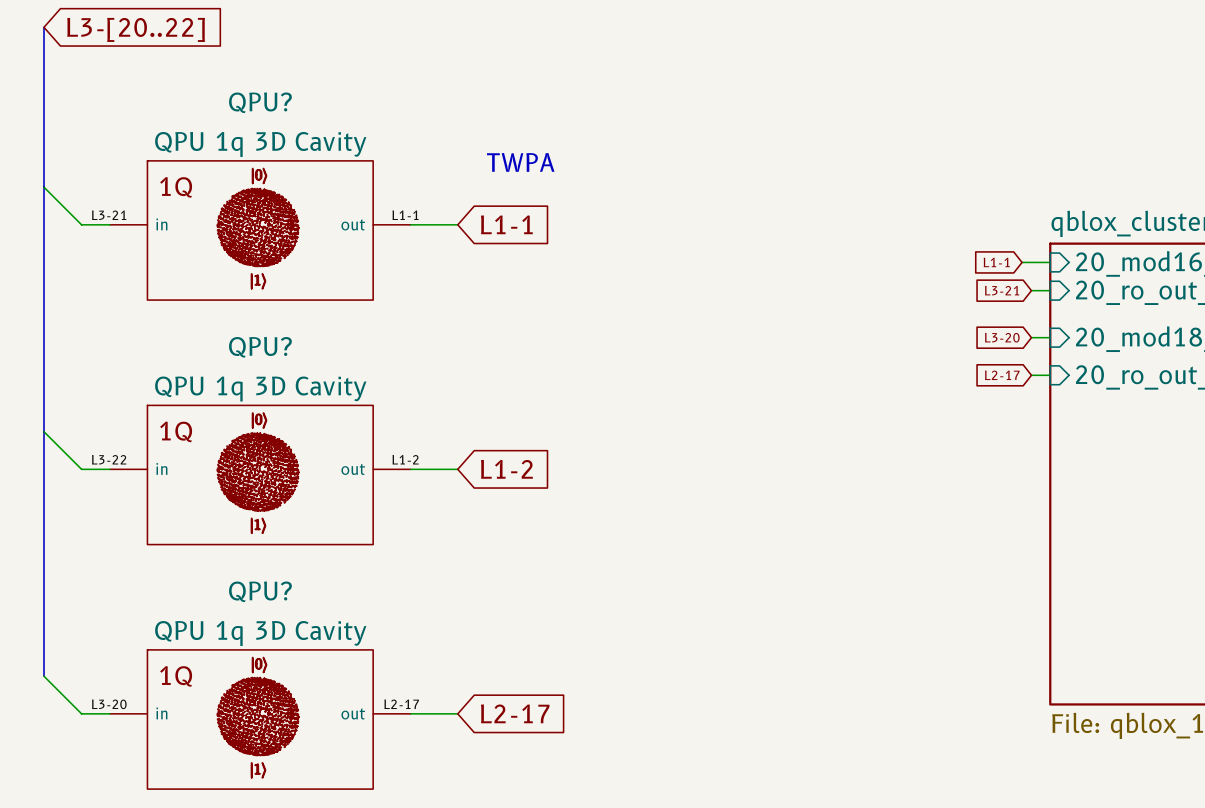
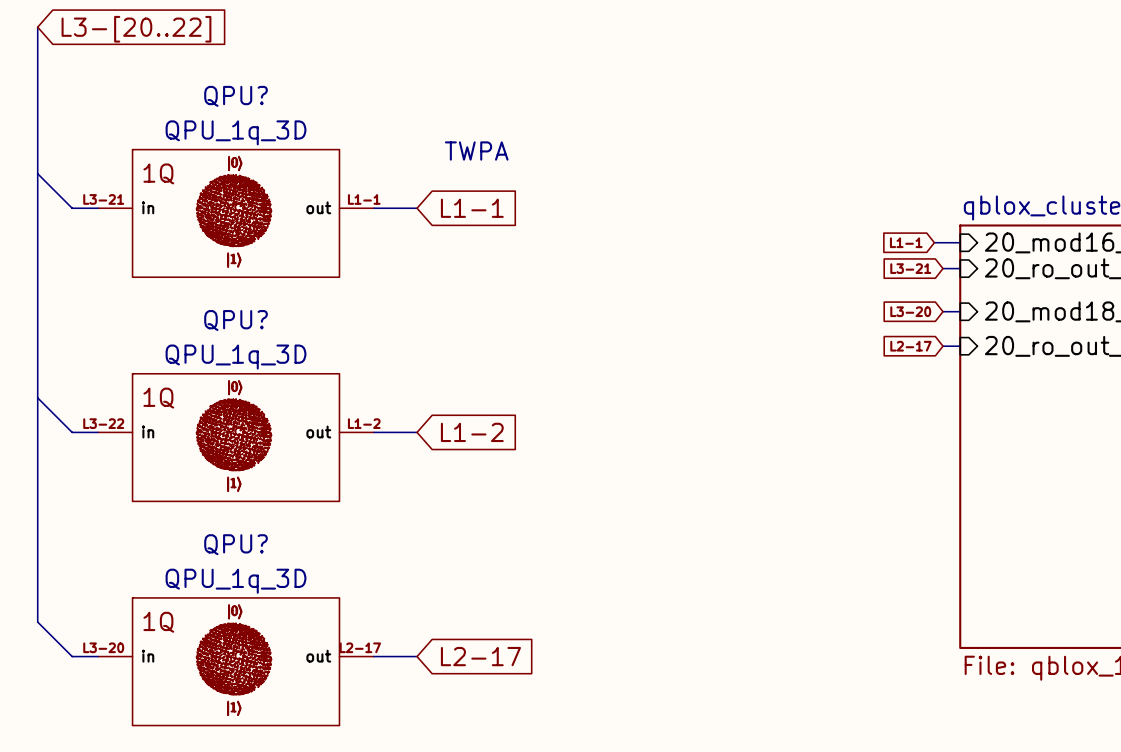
QPU? value: QPU 1q 3D Cavity (260, 144) -> QPU_1q_3D (236, 132)
QPU? value: QPU 1q 3D Cavity (260, 388) -> QPU_1q_3D (236, 357)
QPU? value: QPU 1q 3D Cavity (260, 633) -> QPU_1q_3D (236, 581)

